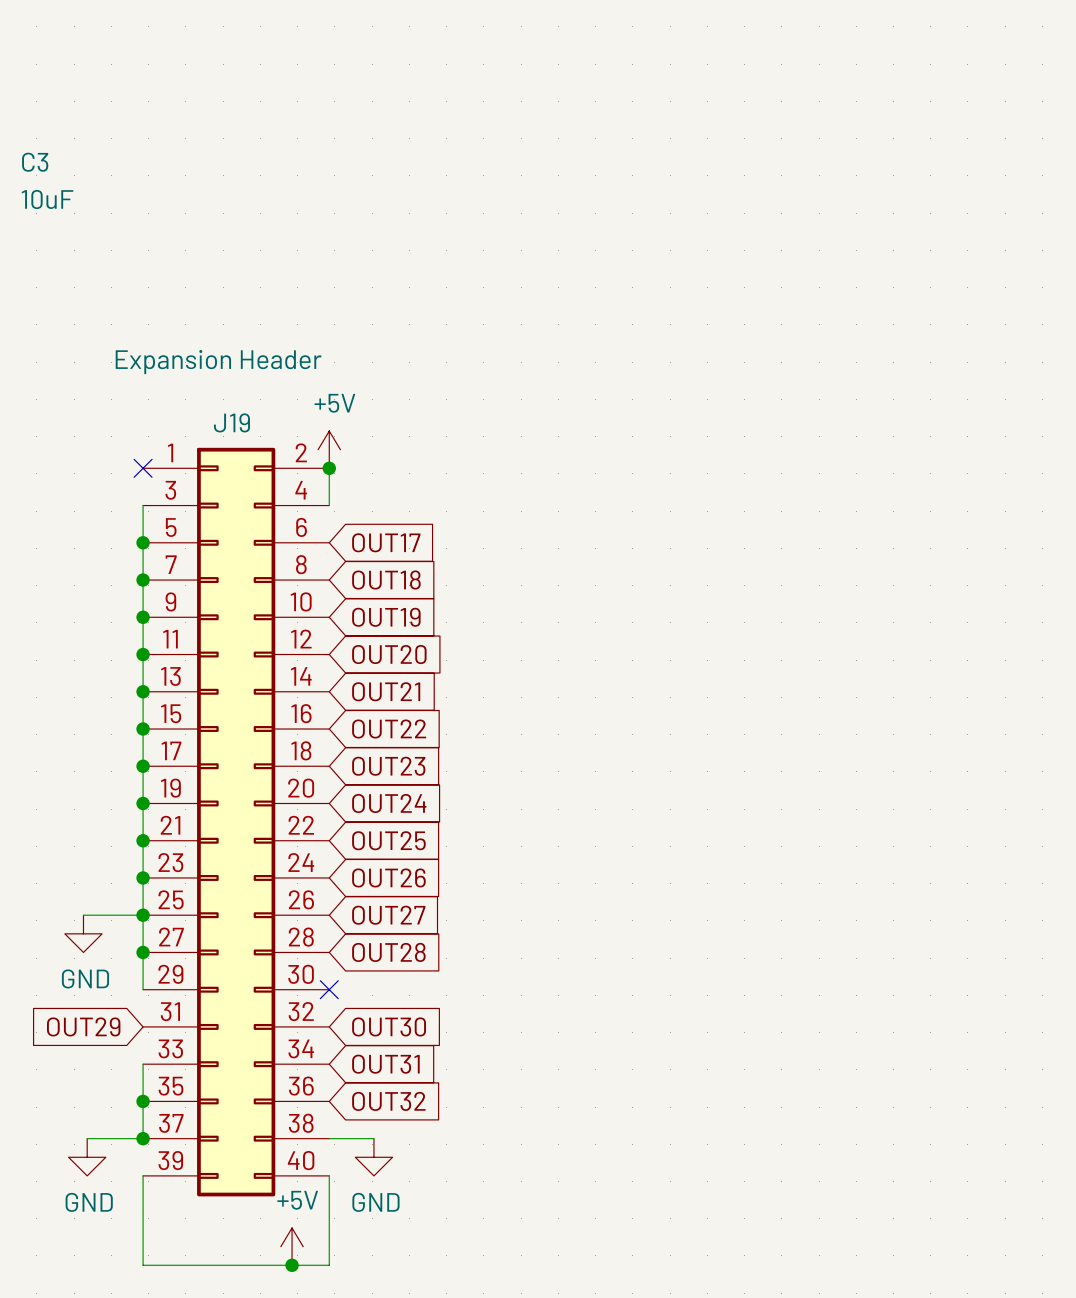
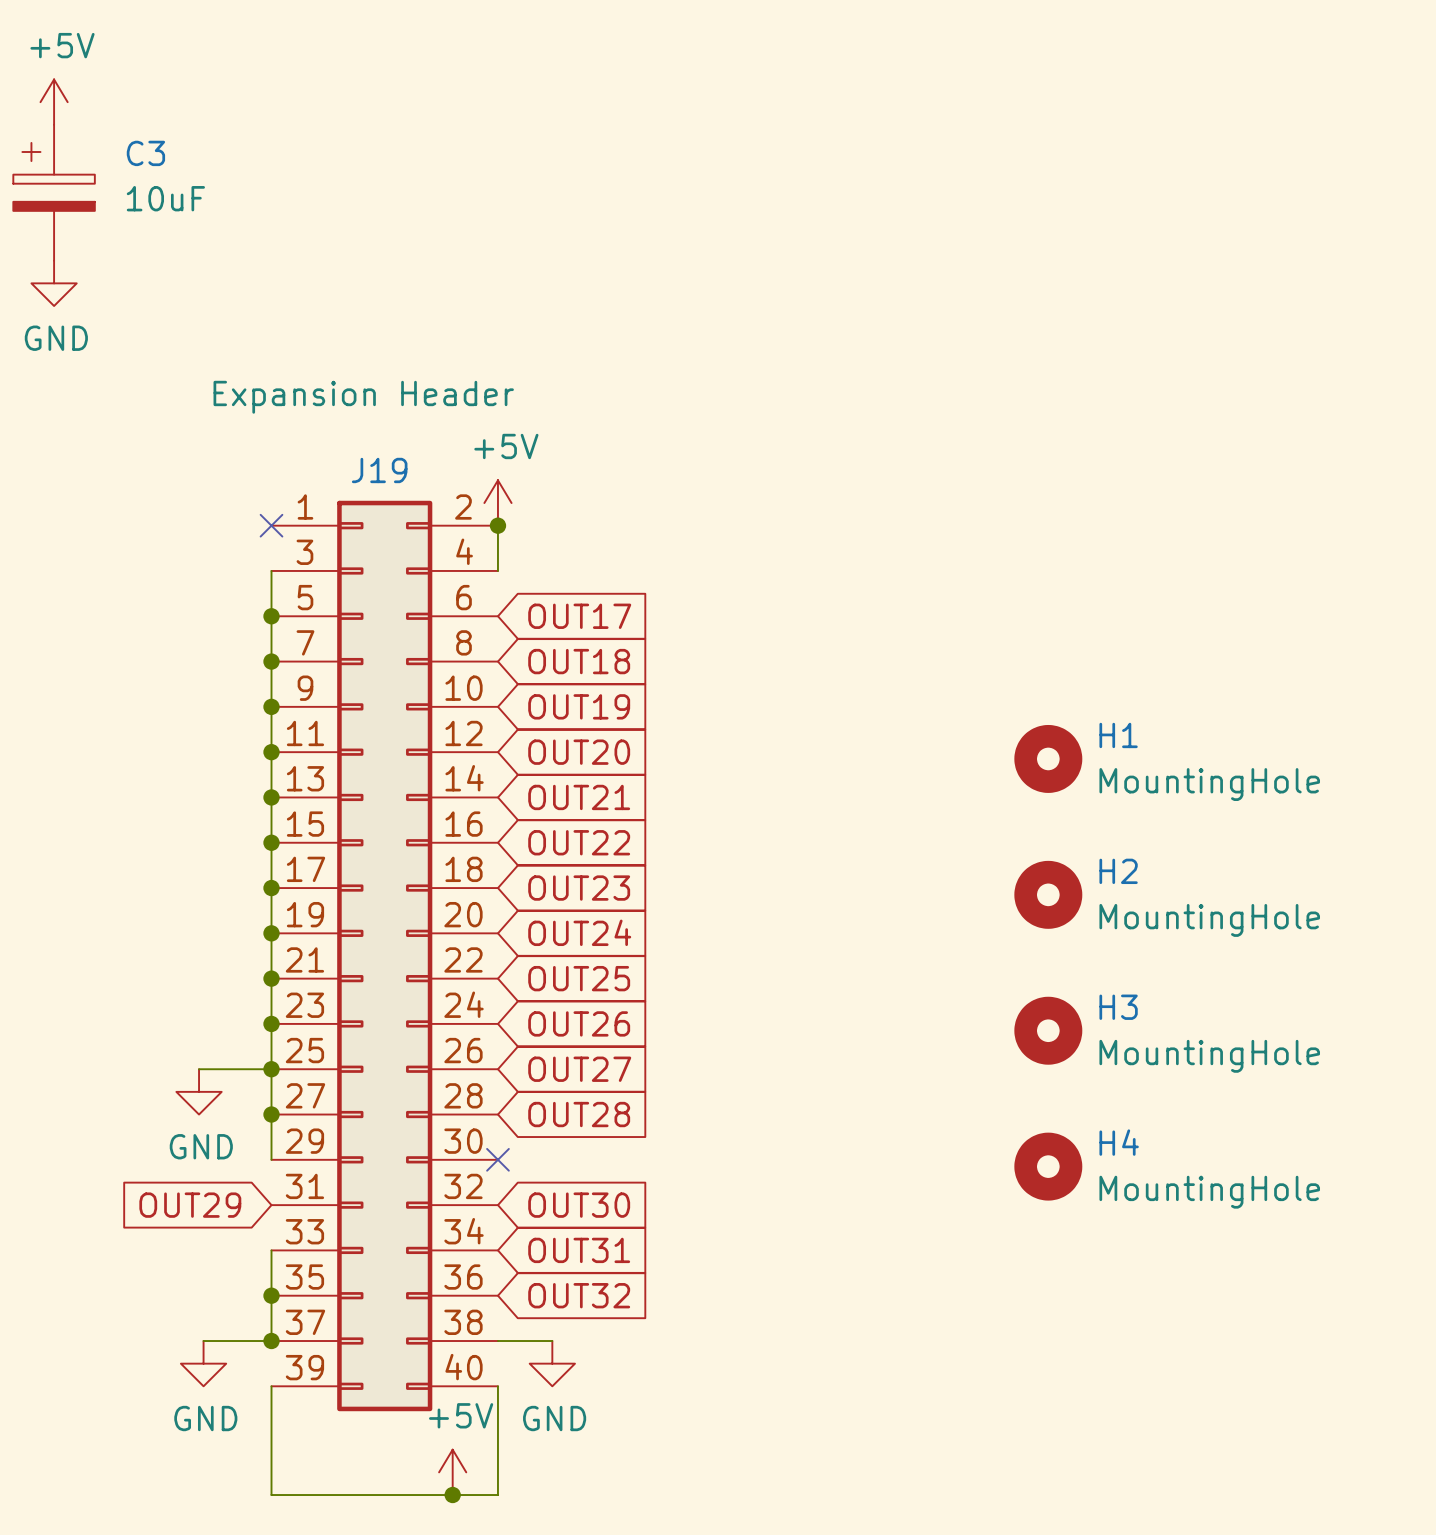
H1: none -> MountingHole (1048, 758)
H2: none -> MountingHole (1048, 894)
H3: none -> MountingHole (1048, 1030)
H4: none -> MountingHole (1048, 1166)

